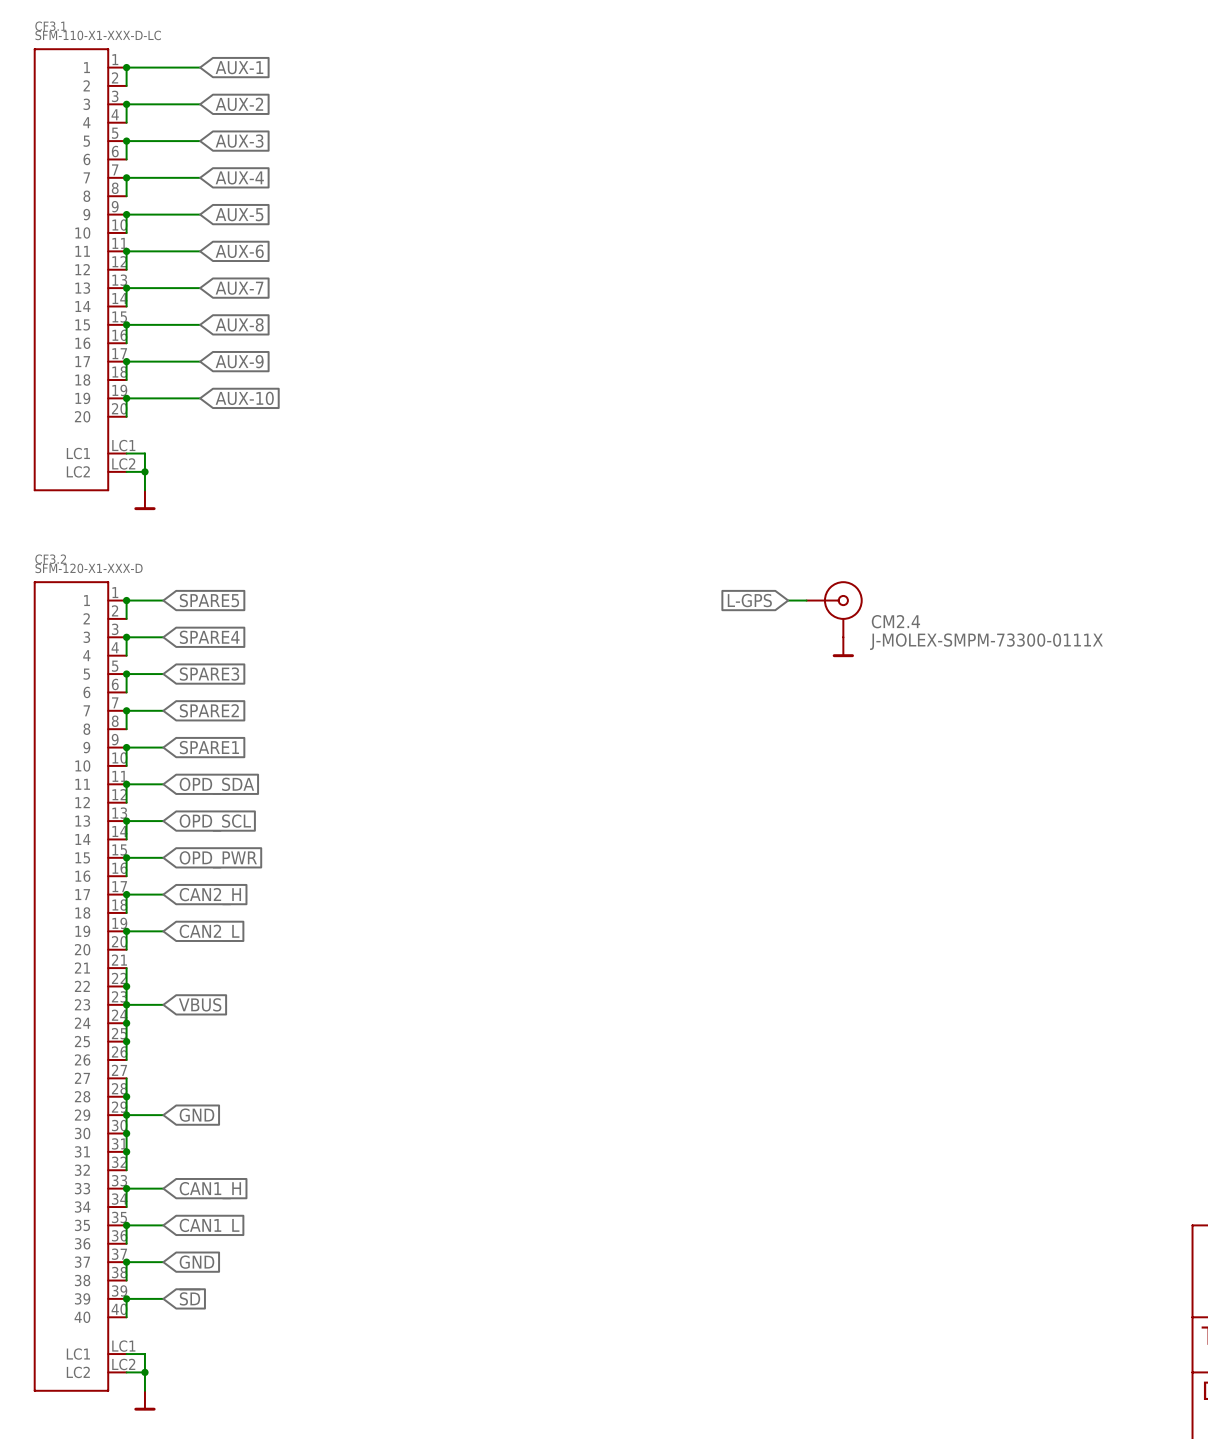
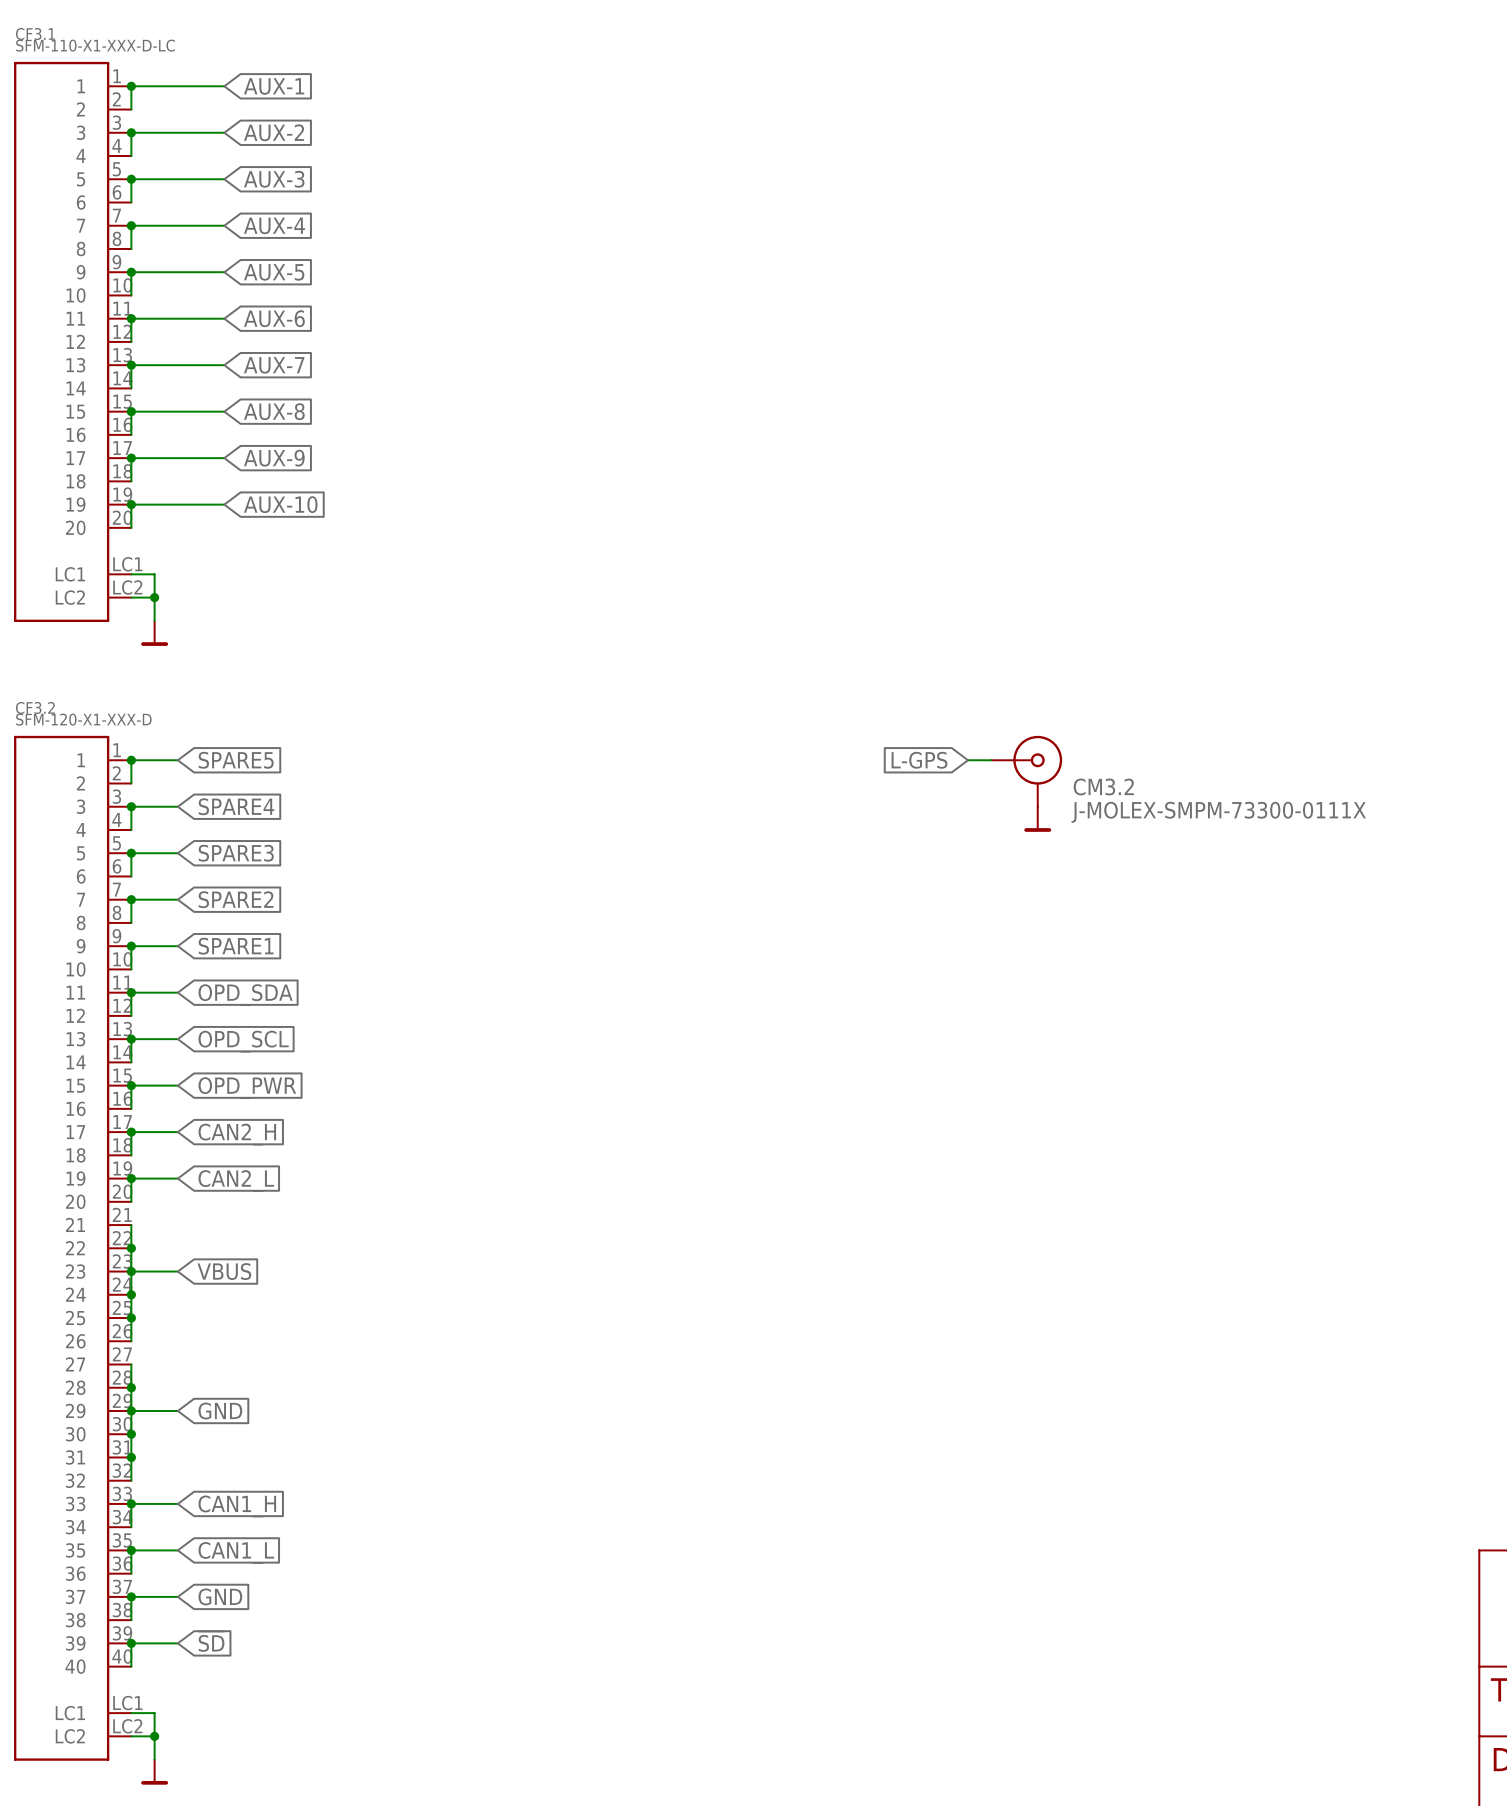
CM2.4 name: CM2.4 (895, 621) -> CM3.2 (1103, 787)

